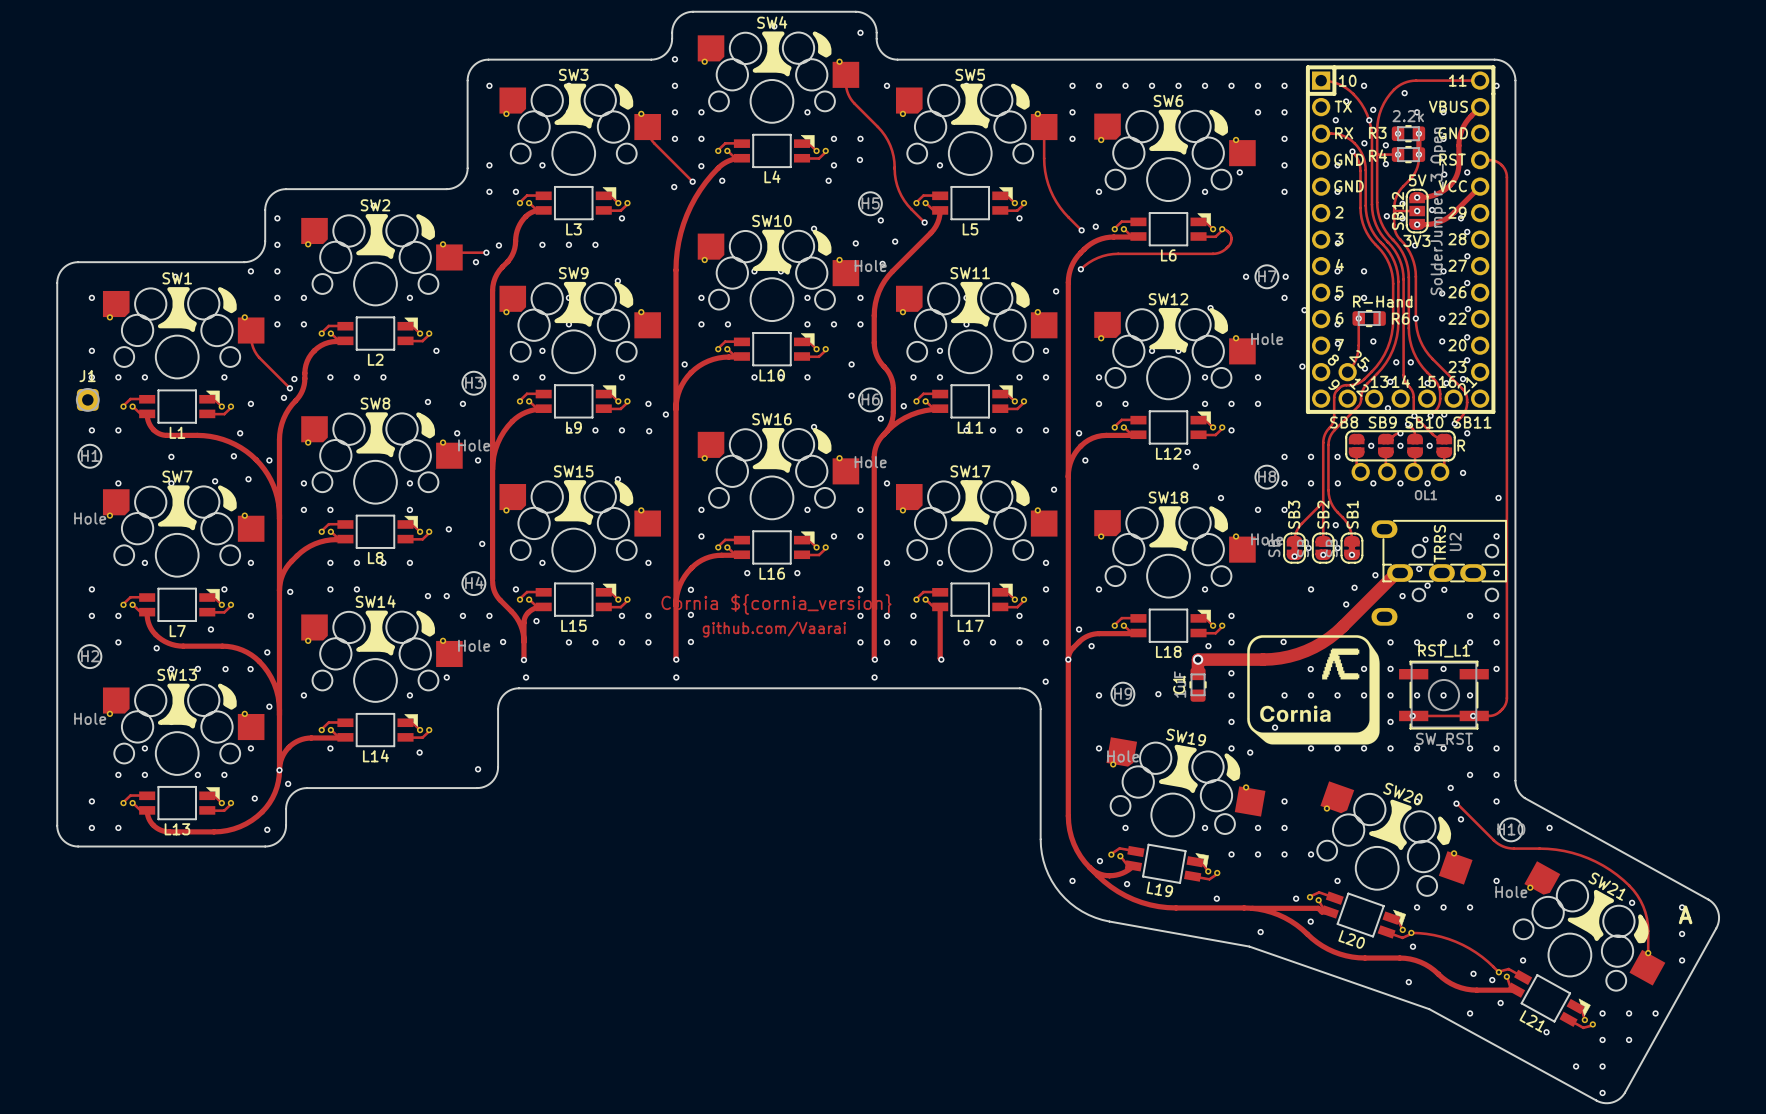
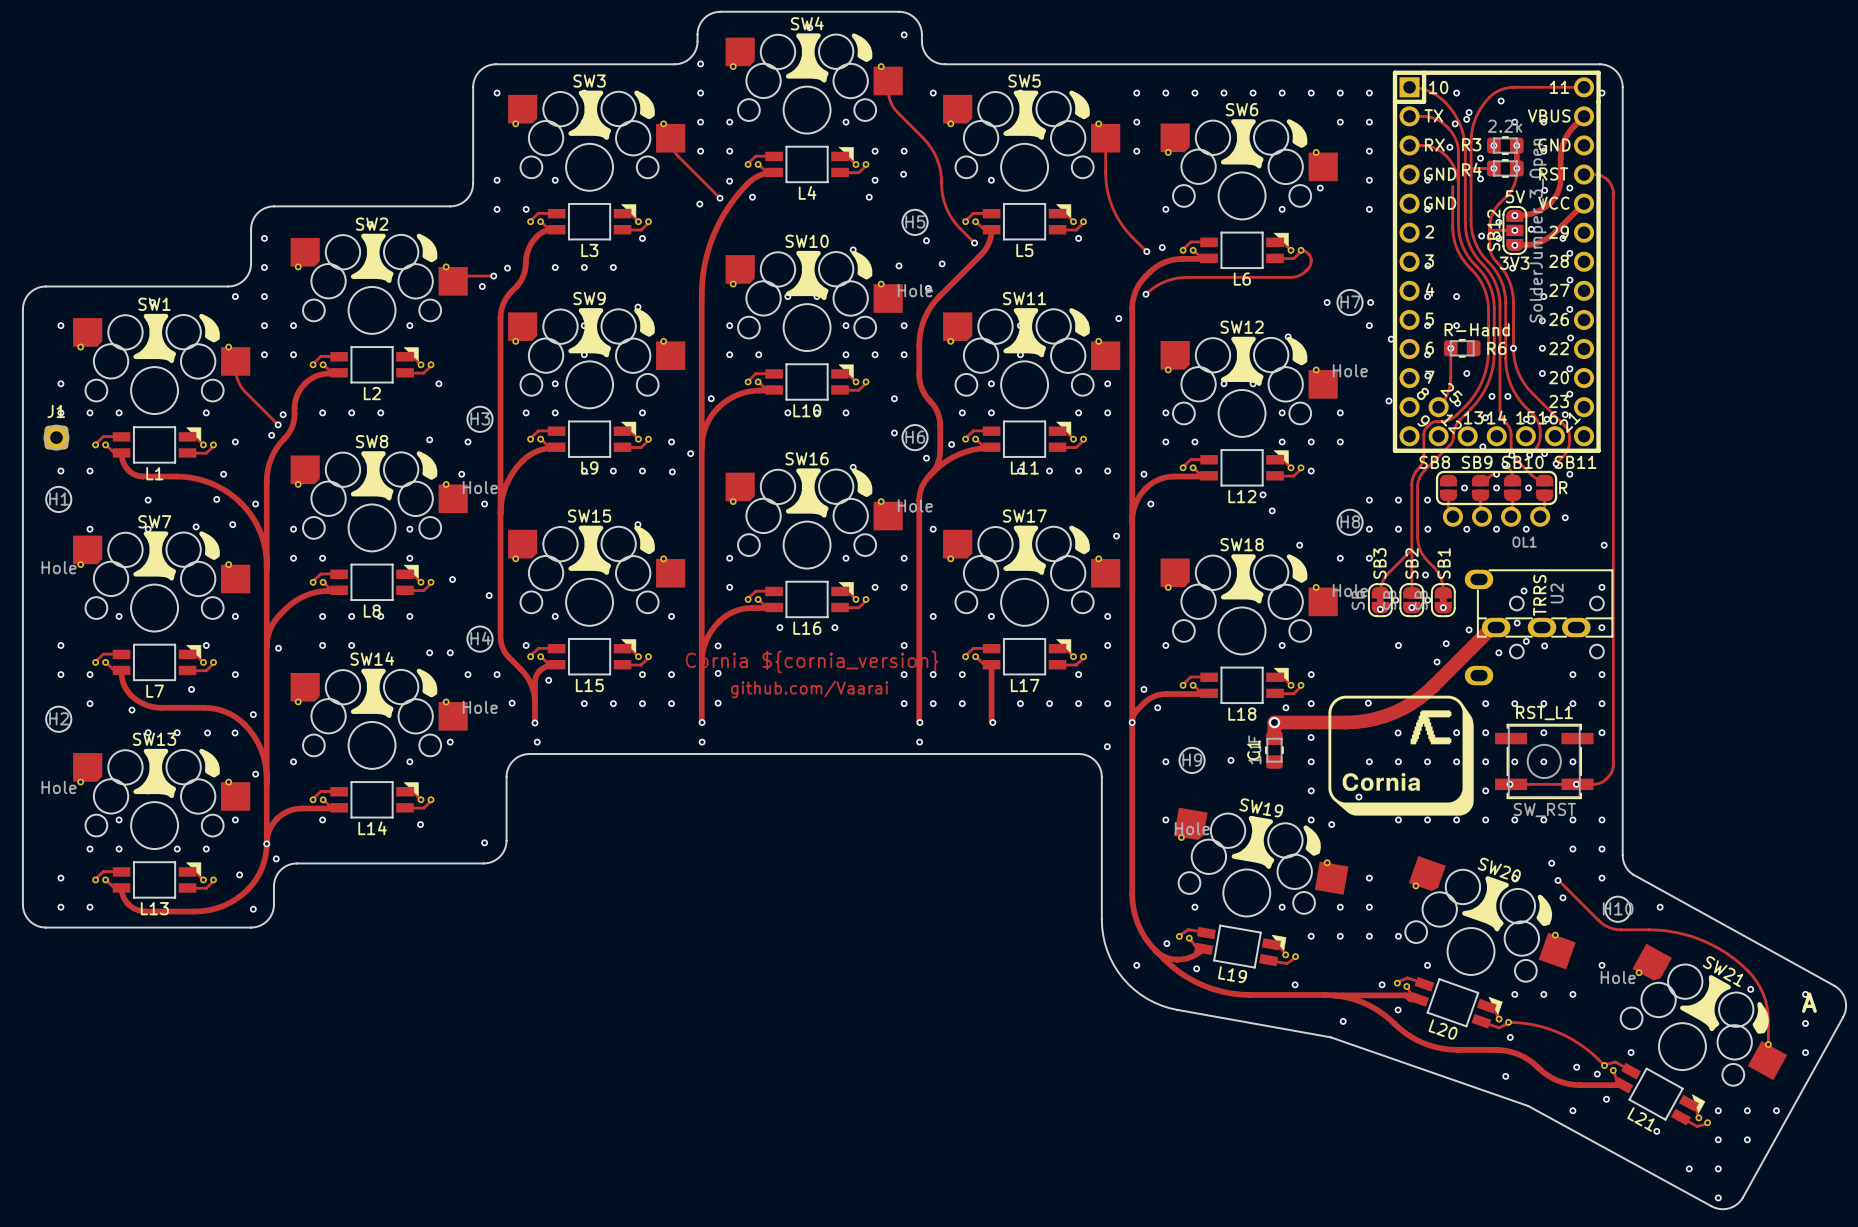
via: (1346, 101) -> none
via: none -> (1469, 112)
track: none -> (1409, 116) (1435, 118) (1451, 131) (1458, 148) (1458, 185)
via: none -> (1455, 123)
via: (1335, 120) -> none
via: (1369, 120) -> none
via: none -> (1449, 147)
via: (1364, 143) -> none
track: (1352, 151) (1358, 160) (1360, 170) -> none
via: (1352, 151) -> none

